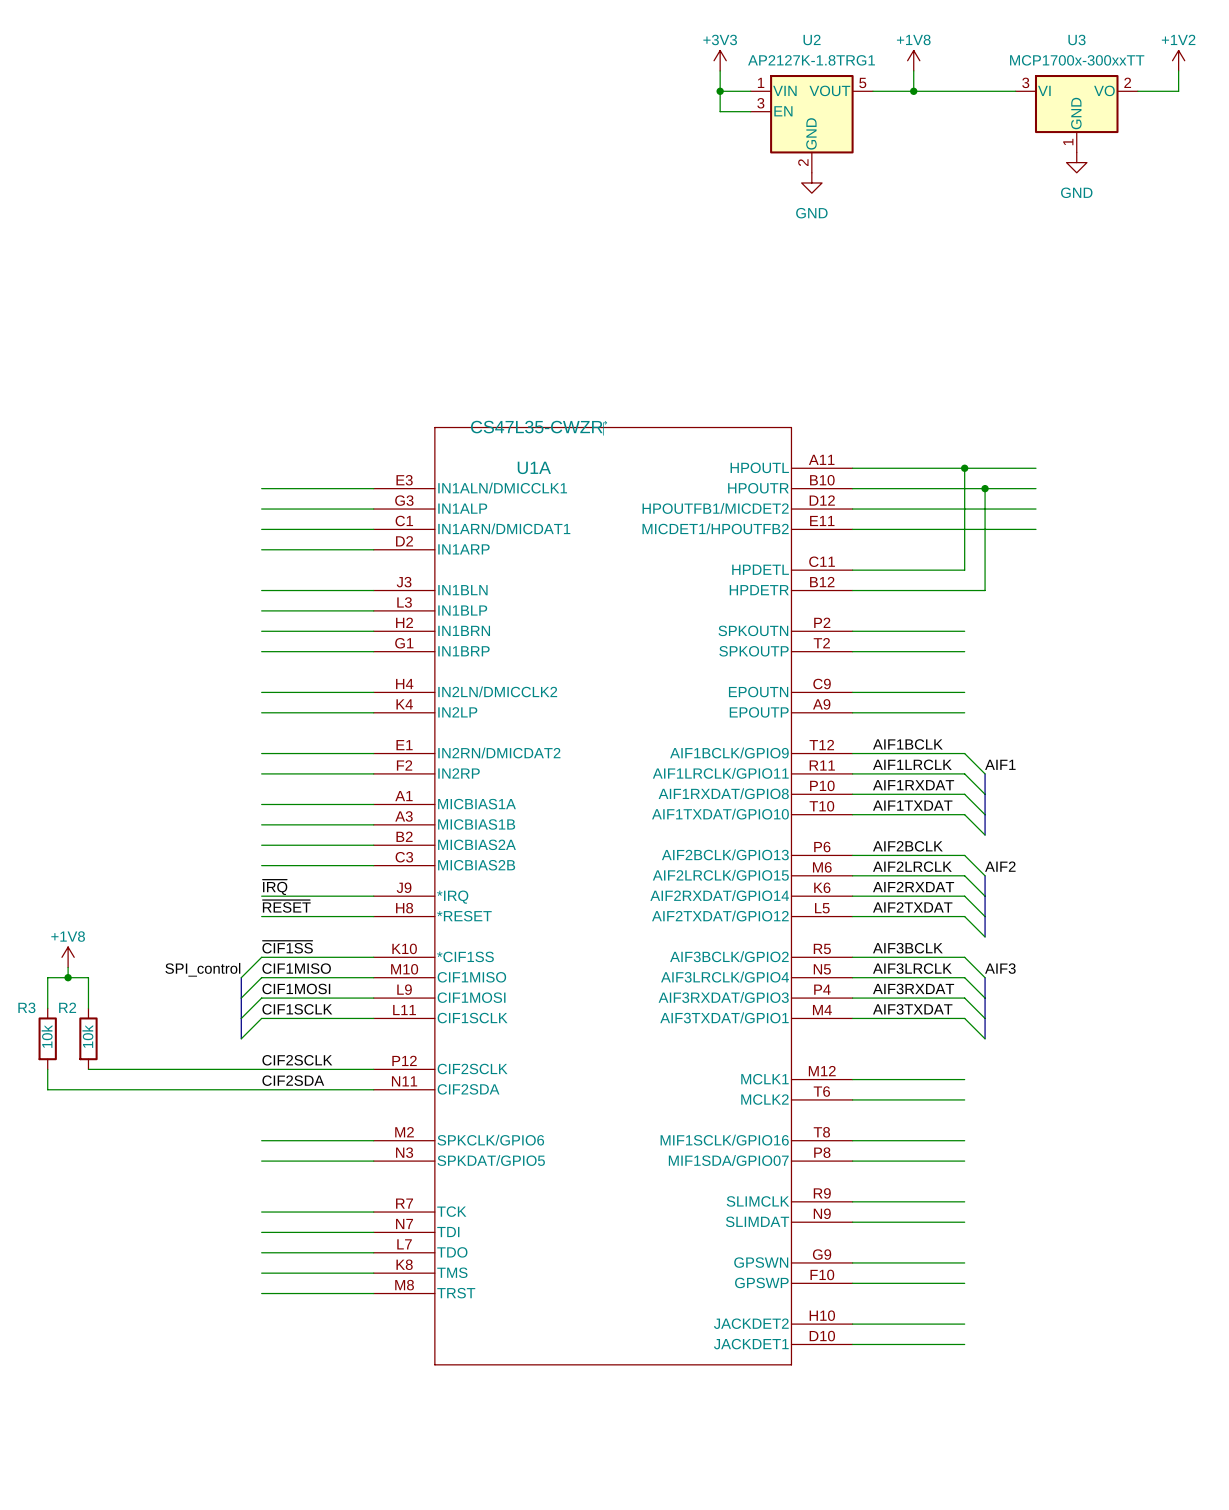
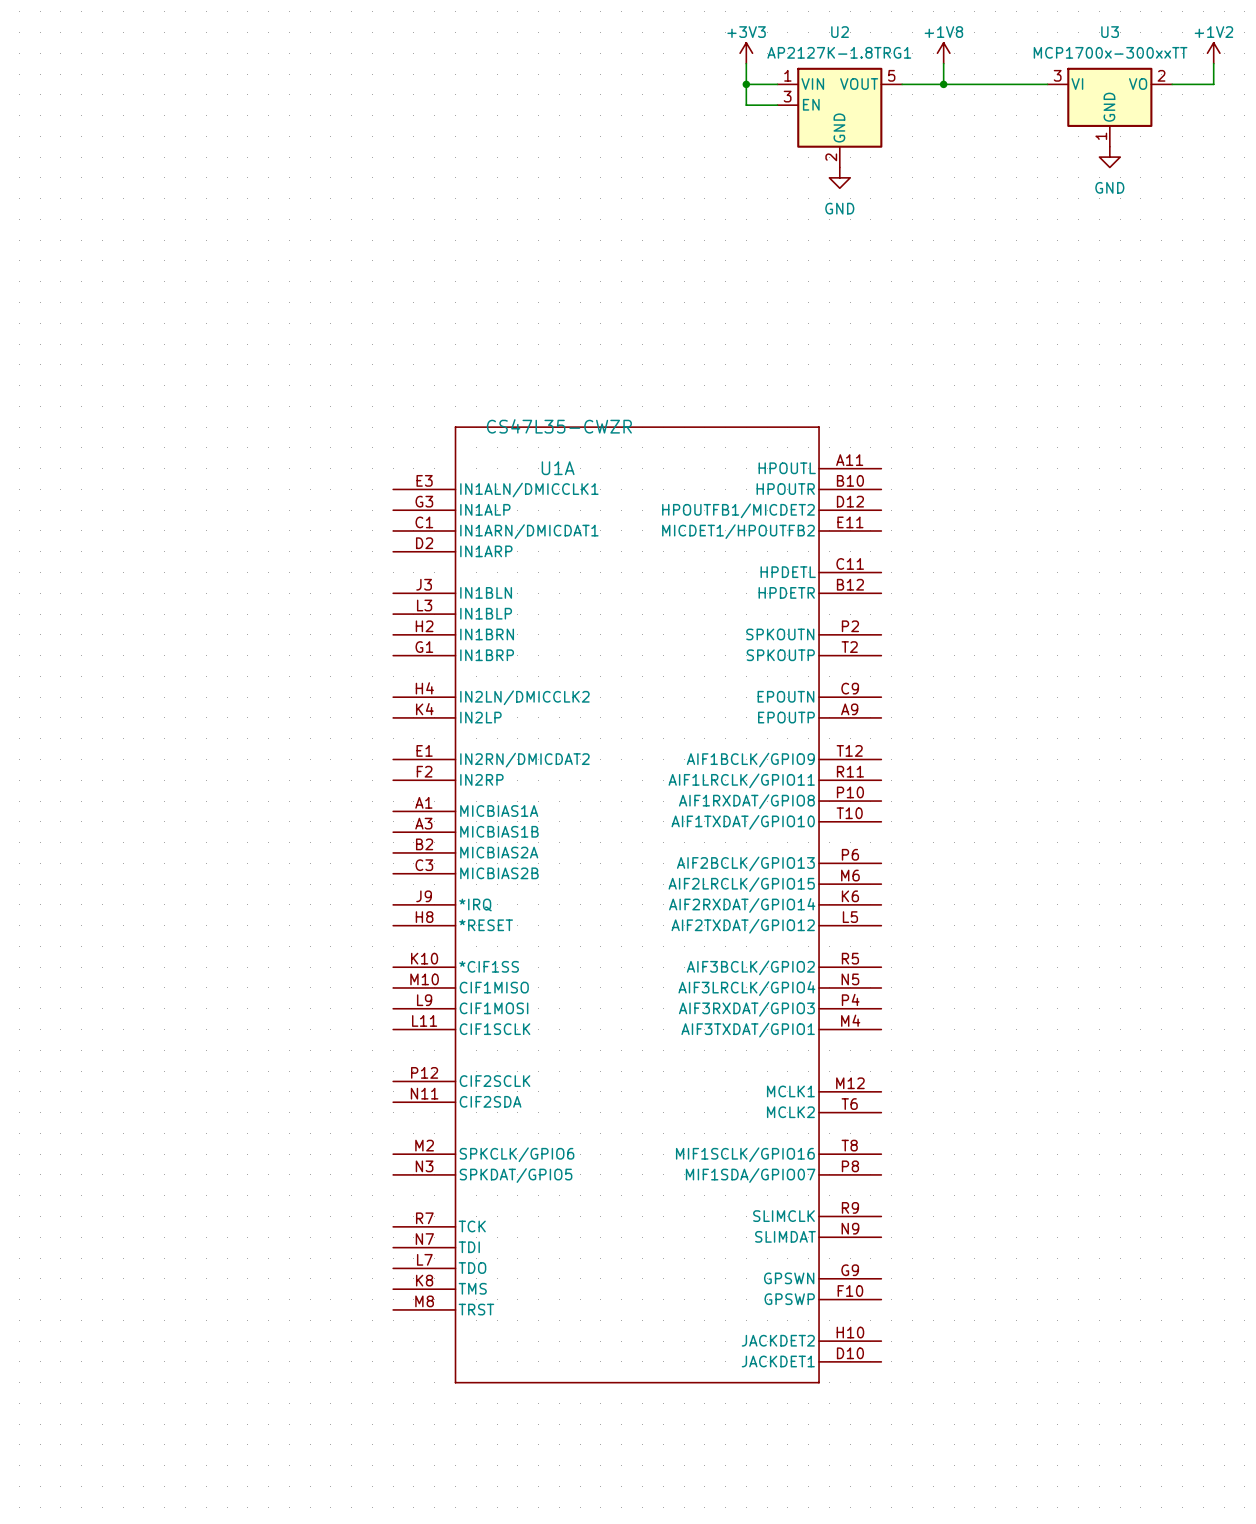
wire: (852, 468) (1035, 468) -> none
wire: (964, 468) (964, 570) (852, 570) -> none
junction: (964, 468) -> none
wire: (261, 488) (373, 488) -> none
wire: (852, 488) (1035, 488) -> none
wire: (985, 488) (985, 590) (852, 590) -> none
junction: (985, 488) -> none
wire: (261, 509) (373, 509) -> none
wire: (852, 509) (1035, 509) -> none
wire: (261, 529) (373, 529) -> none
wire: (852, 529) (1035, 529) -> none
wire: (261, 549) (373, 549) -> none
wire: (261, 590) (373, 590) -> none
wire: (261, 610) (373, 610) -> none
wire: (261, 631) (373, 631) -> none
wire: (852, 631) (964, 631) -> none
wire: (261, 651) (373, 651) -> none
wire: (852, 651) (964, 651) -> none
wire: (261, 692) (373, 692) -> none
wire: (852, 692) (964, 692) -> none
wire: (261, 712) (373, 712) -> none
wire: (852, 712) (964, 712) -> none
label: AIF1BCLK (907, 744) -> none
wire: (261, 753) (373, 753) -> none
wire: (852, 753) (964, 753) (985, 773) -> none
label: AIF1LRCLK (912, 764) -> none
label: AIF1 (1000, 764) -> none
wire: (261, 773) (373, 773) -> none
wire: (852, 773) (964, 773) (985, 794) -> none
bus: (985, 773) (985, 835) -> none
label: AIF1RXDAT (913, 785) -> none
wire: (852, 794) (964, 794) (985, 814) -> none
wire: (261, 804) (373, 804) -> none
label: AIF1TXDAT (912, 805) -> none
wire: (852, 814) (964, 814) (985, 835) -> none
wire: (261, 824) (373, 824) -> none
wire: (261, 845) (373, 845) -> none
label: AIF2BCLK (907, 846) -> none
wire: (852, 855) (964, 855) (985, 875) -> none
wire: (261, 865) (373, 865) -> none
label: AIF2LRCLK (912, 866) -> none
label: AIF2 (1000, 866) -> none
wire: (852, 875) (964, 875) (985, 896) -> none
bus: (985, 875) (985, 936) -> none
label: ~{IRQ} (274, 887) -> none
label: AIF2RXDAT (913, 887) -> none
wire: (261, 896) (373, 896) -> none
wire: (852, 896) (964, 896) (985, 916) -> none
label: ~{RESET} (286, 906) -> none
label: AIF2TXDAT (912, 907) -> none
wire: (261, 916) (373, 916) -> none
wire: (852, 916) (964, 916) (985, 936) -> none
label: ~{CIF1SS} (287, 947) -> none
label: AIF3BCLK (907, 948) -> none
power symbol: +1V8 (68, 957) -> none
wire: (373, 957) (261, 957) (241, 977) -> none
wire: (852, 957) (964, 957) (985, 977) -> none
wire: (68, 967) (68, 977) -> none
label: CIF1MISO (296, 968) -> none
label: AIF3LRCLK (912, 968) -> none
label: AIF3 (1000, 968) -> none
label: SPI_control (202, 969) -> none
junction: (68, 977) -> none
bus: (241, 977) (241, 1038) -> none
wire: (373, 977) (261, 977) (241, 998) -> none
wire: (852, 977) (964, 977) (985, 998) -> none
bus: (985, 977) (985, 1038) -> none
label: CIF1MOSI (296, 988) -> none
label: AIF3RXDAT (913, 988) -> none
wire: (373, 998) (261, 998) (241, 1018) -> none
wire: (852, 998) (964, 998) (985, 1018) -> none
wire: (47, 1008) (47, 977) (88, 977) (88, 1008) -> none
label: CIF1SCLK (297, 1009) -> none
label: AIF3TXDAT (912, 1009) -> none
wire: (373, 1018) (261, 1018) (241, 1038) -> none
wire: (852, 1018) (964, 1018) (985, 1038) -> none
R3: 10k (47, 1038) -> none
R2: 10k (88, 1038) -> none
label: CIF2SCLK (297, 1060) -> none
wire: (47, 1069) (47, 1089) (373, 1089) -> none
wire: (88, 1069) (373, 1069) -> none
wire: (852, 1079) (964, 1079) -> none
label: CIF2SDA (293, 1080) -> none
wire: (852, 1099) (964, 1099) -> none
wire: (261, 1140) (373, 1140) -> none
wire: (852, 1140) (964, 1140) -> none
wire: (261, 1161) (373, 1161) -> none
wire: (852, 1161) (964, 1161) -> none
wire: (852, 1201) (964, 1201) -> none
wire: (261, 1212) (373, 1212) -> none
wire: (852, 1222) (964, 1222) -> none
wire: (261, 1232) (373, 1232) -> none
wire: (261, 1252) (373, 1252) -> none
wire: (852, 1262) (964, 1262) -> none
wire: (261, 1273) (373, 1273) -> none
wire: (852, 1283) (964, 1283) -> none
wire: (261, 1293) (373, 1293) -> none
wire: (852, 1324) (964, 1324) -> none
wire: (852, 1344) (964, 1344) -> none

